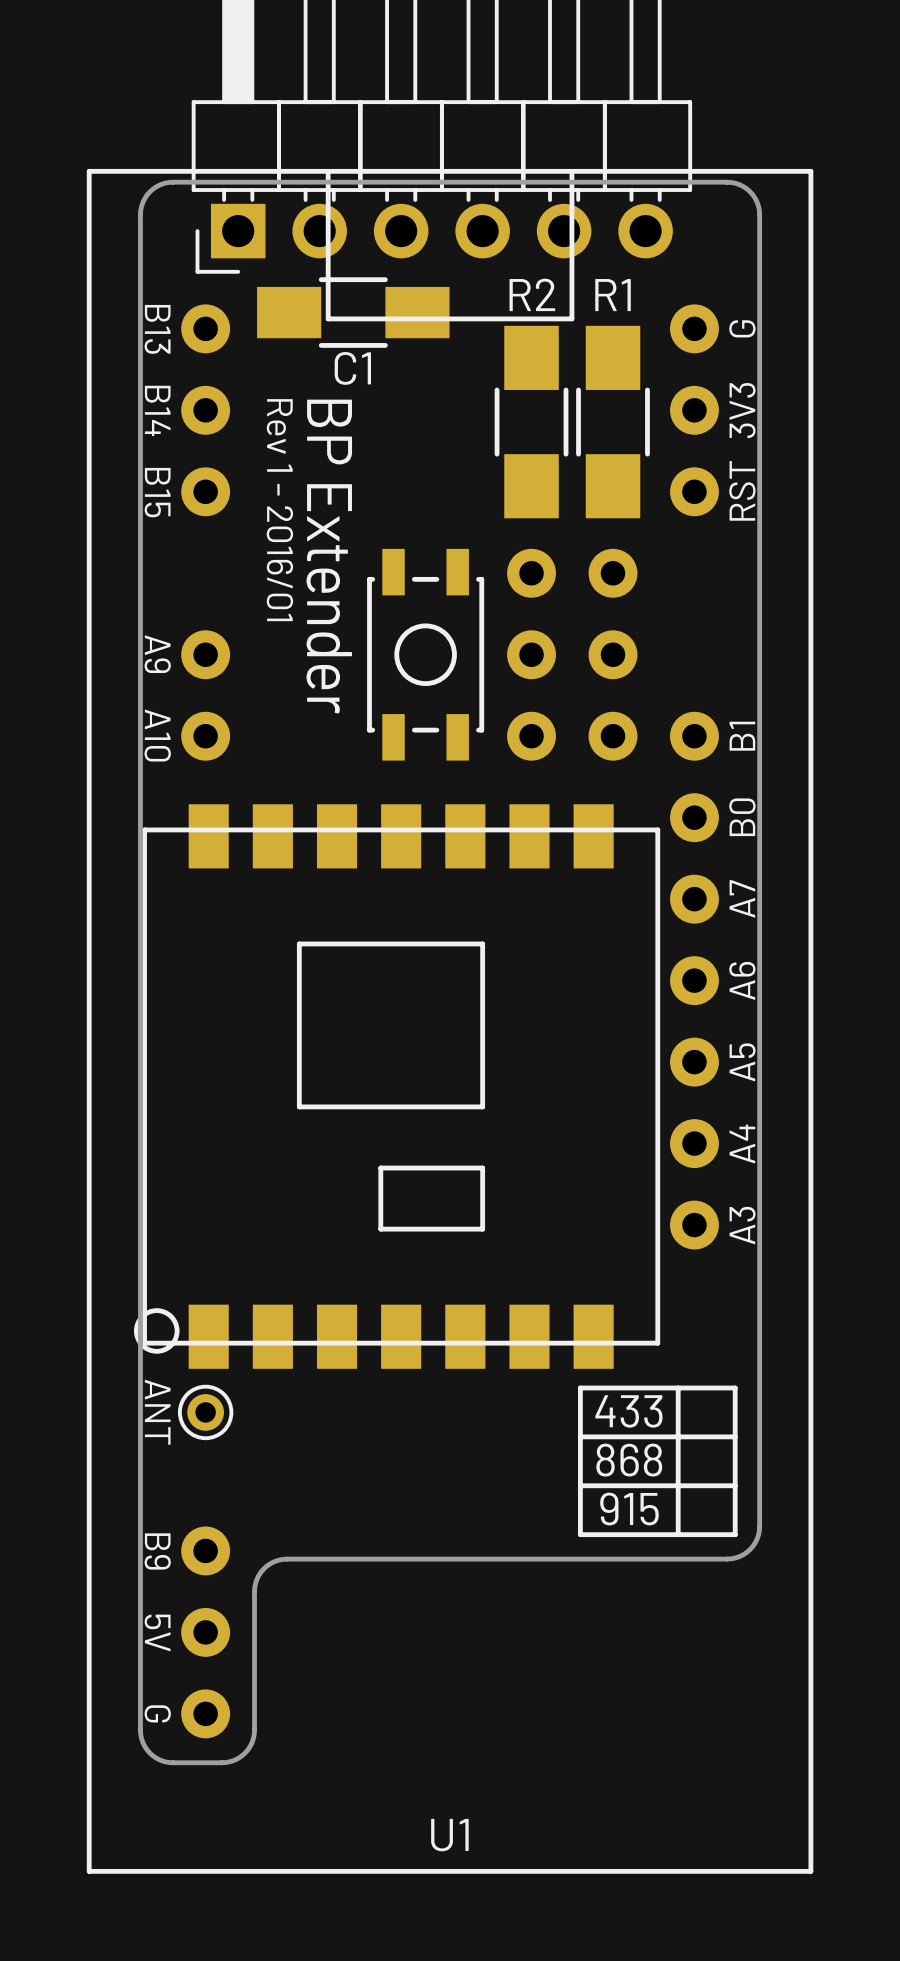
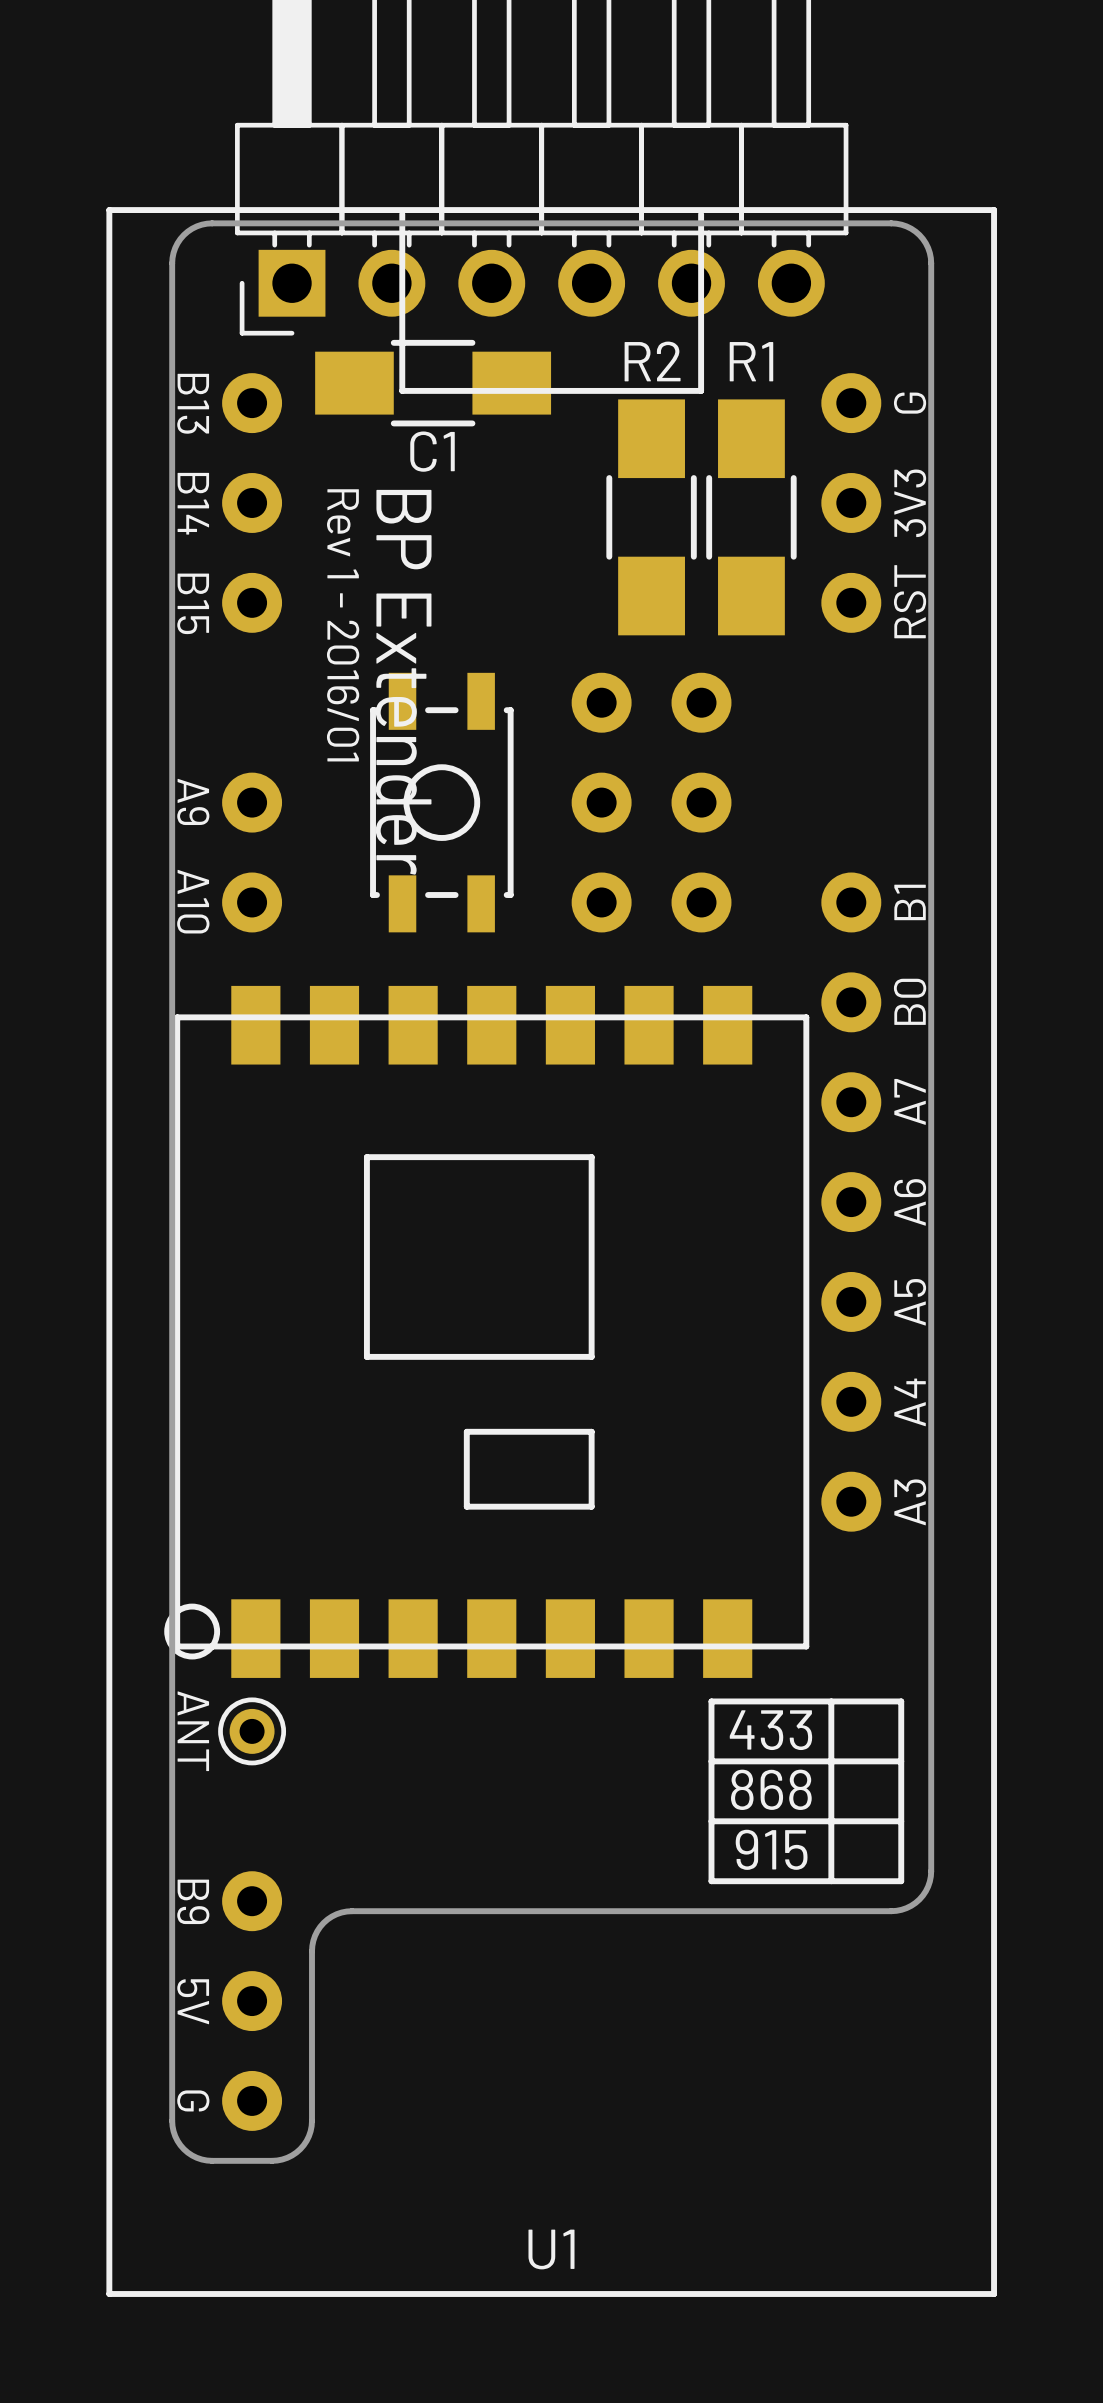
U1 footprint: [86, 168, 814, 1874] -> [106, 207, 997, 2297]
part position: (425, 654) -> (441, 802)

